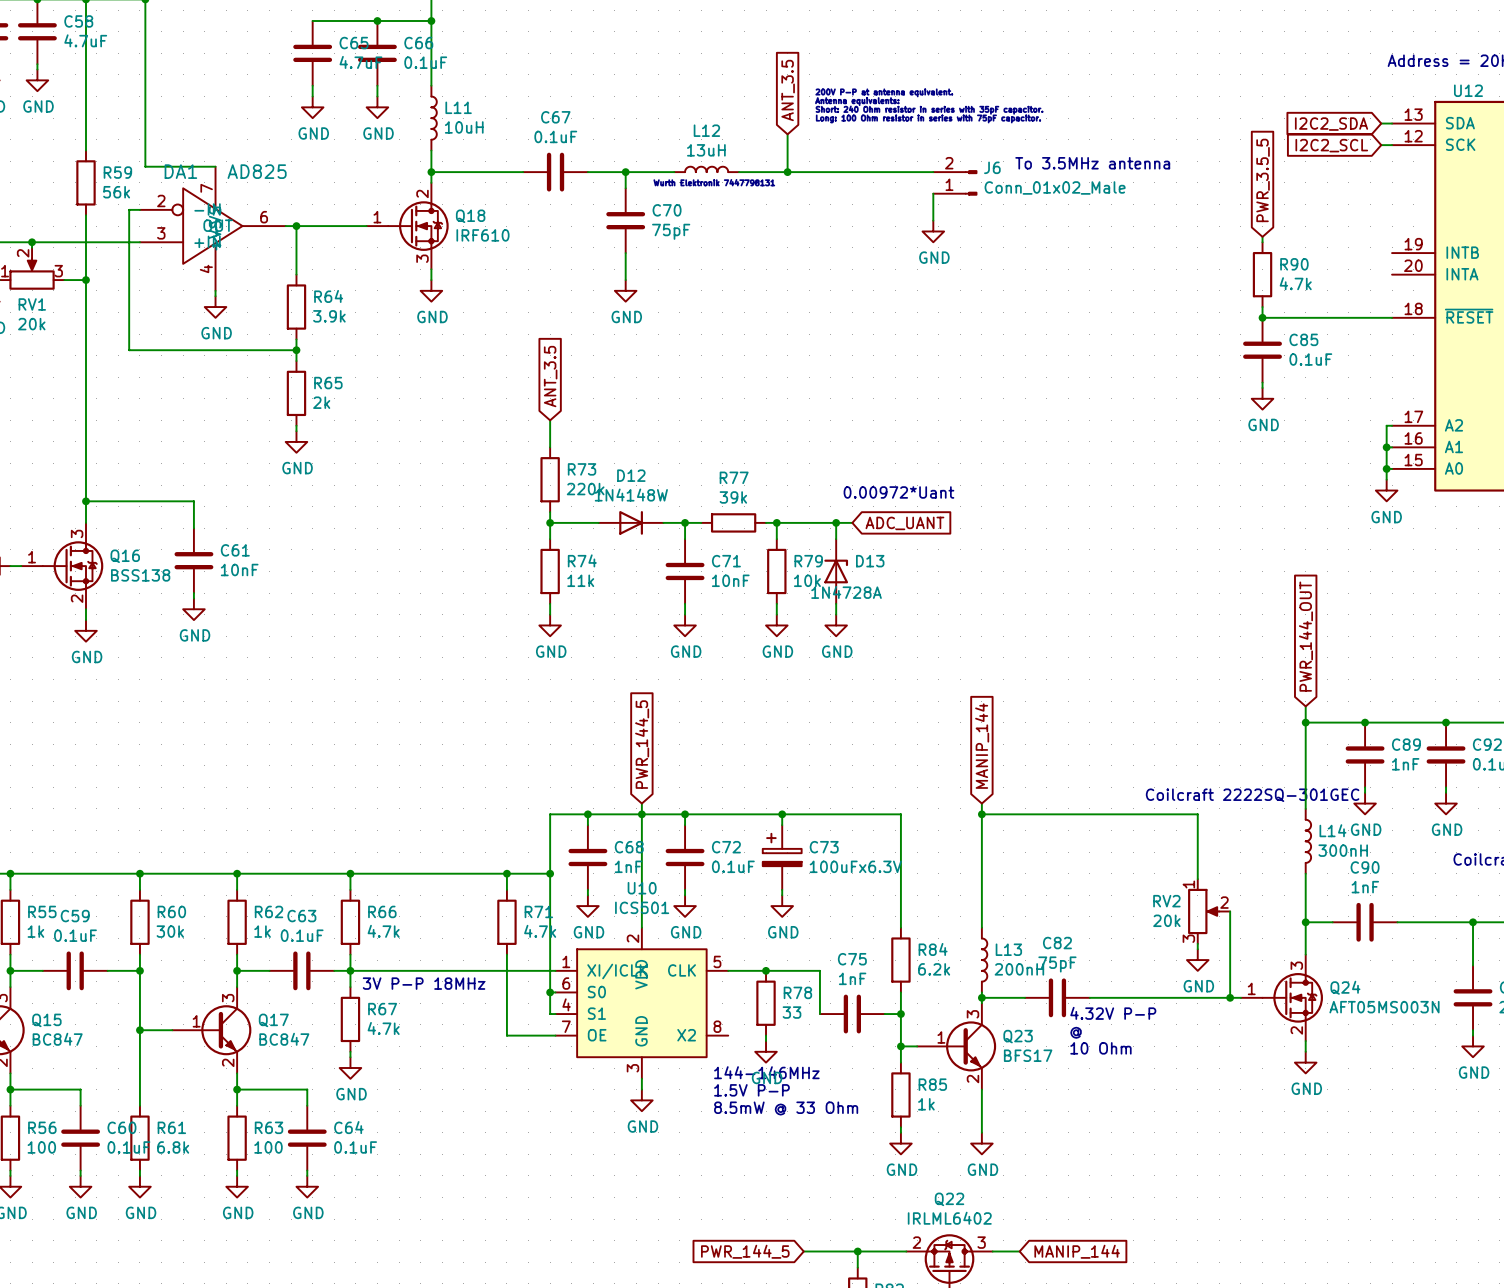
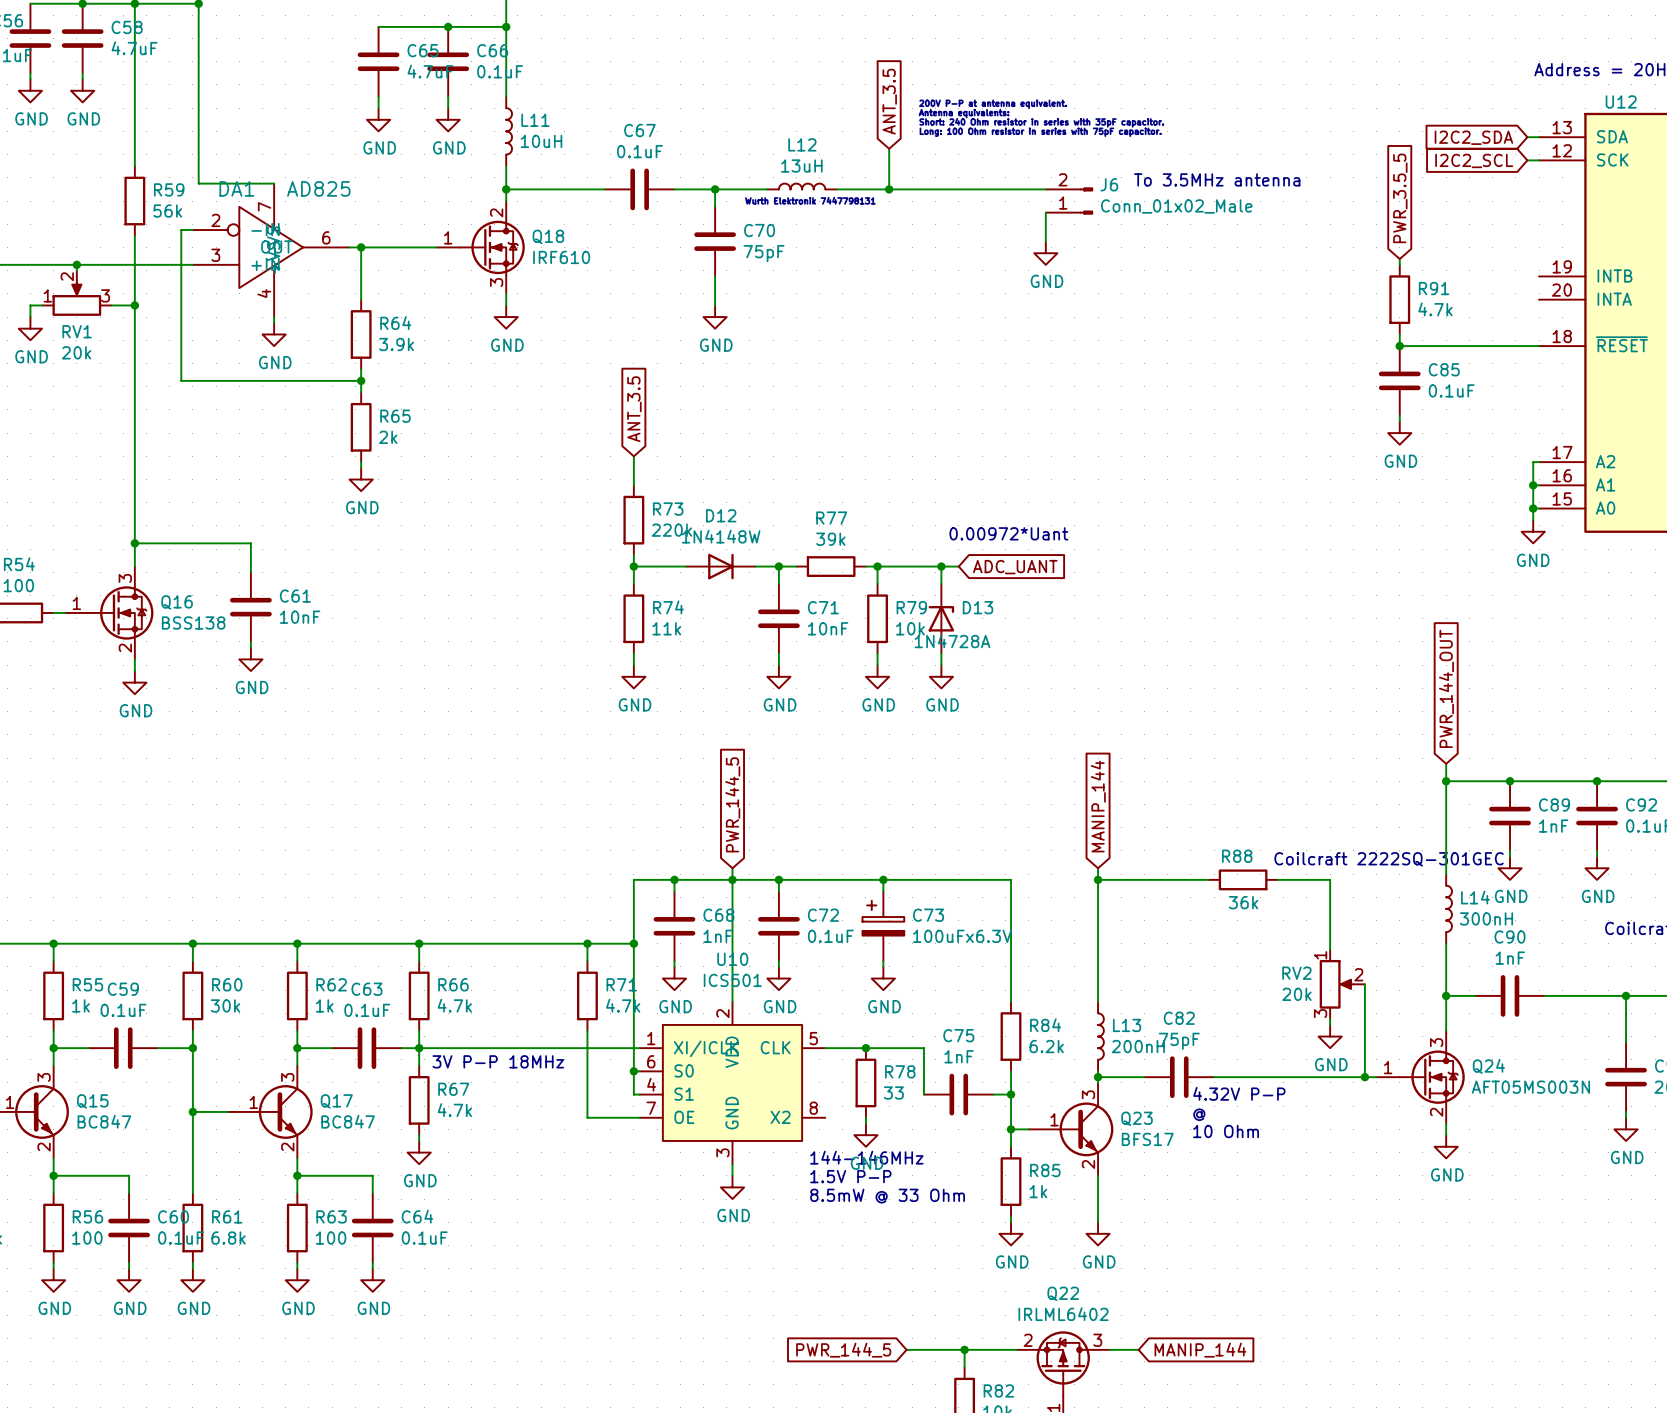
R90 name: R90 (1294, 264) -> R91 (1434, 288)
wire: (1084, 814) (1149, 814) -> none
R88: none -> 36k (1243, 879)

